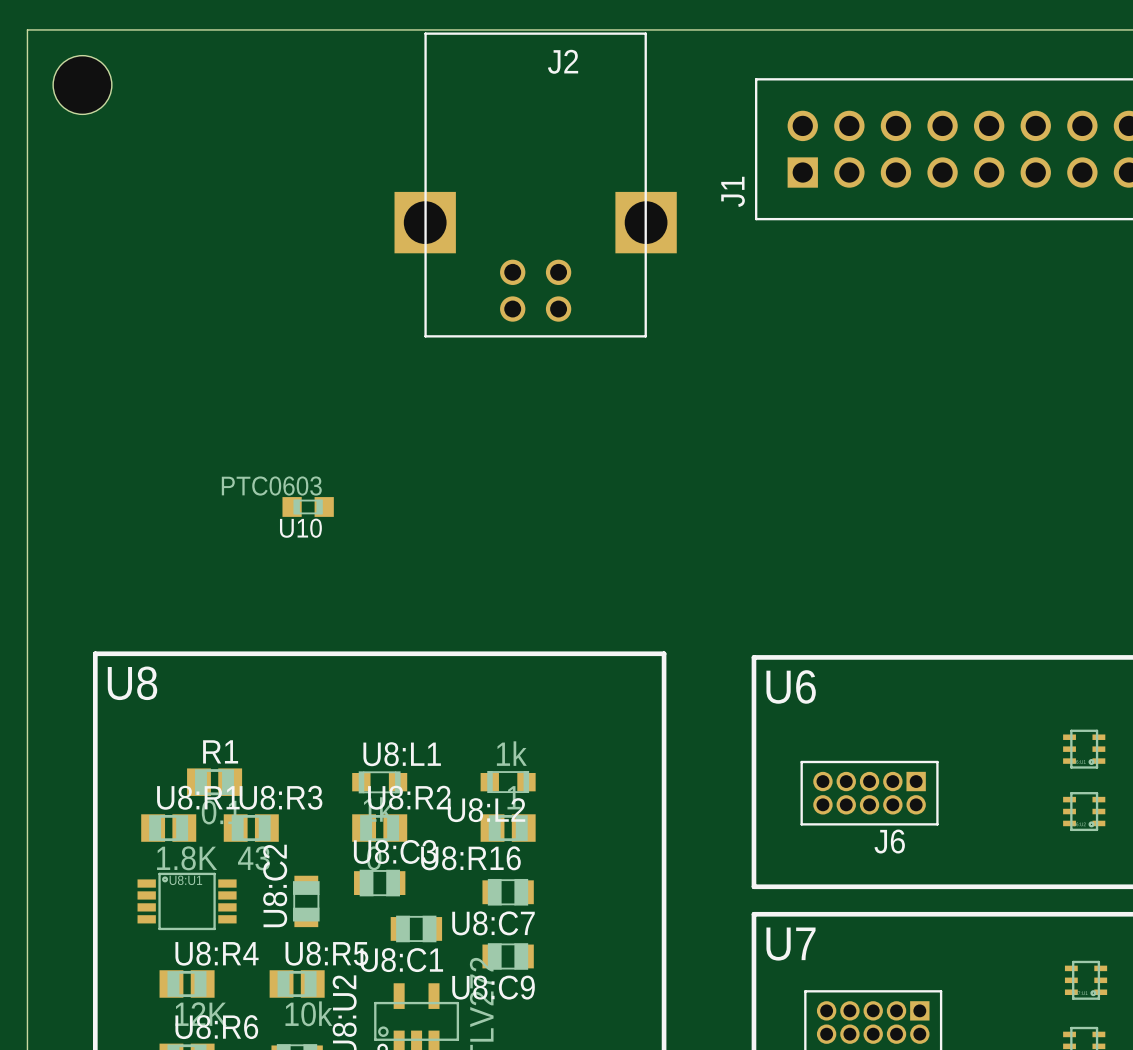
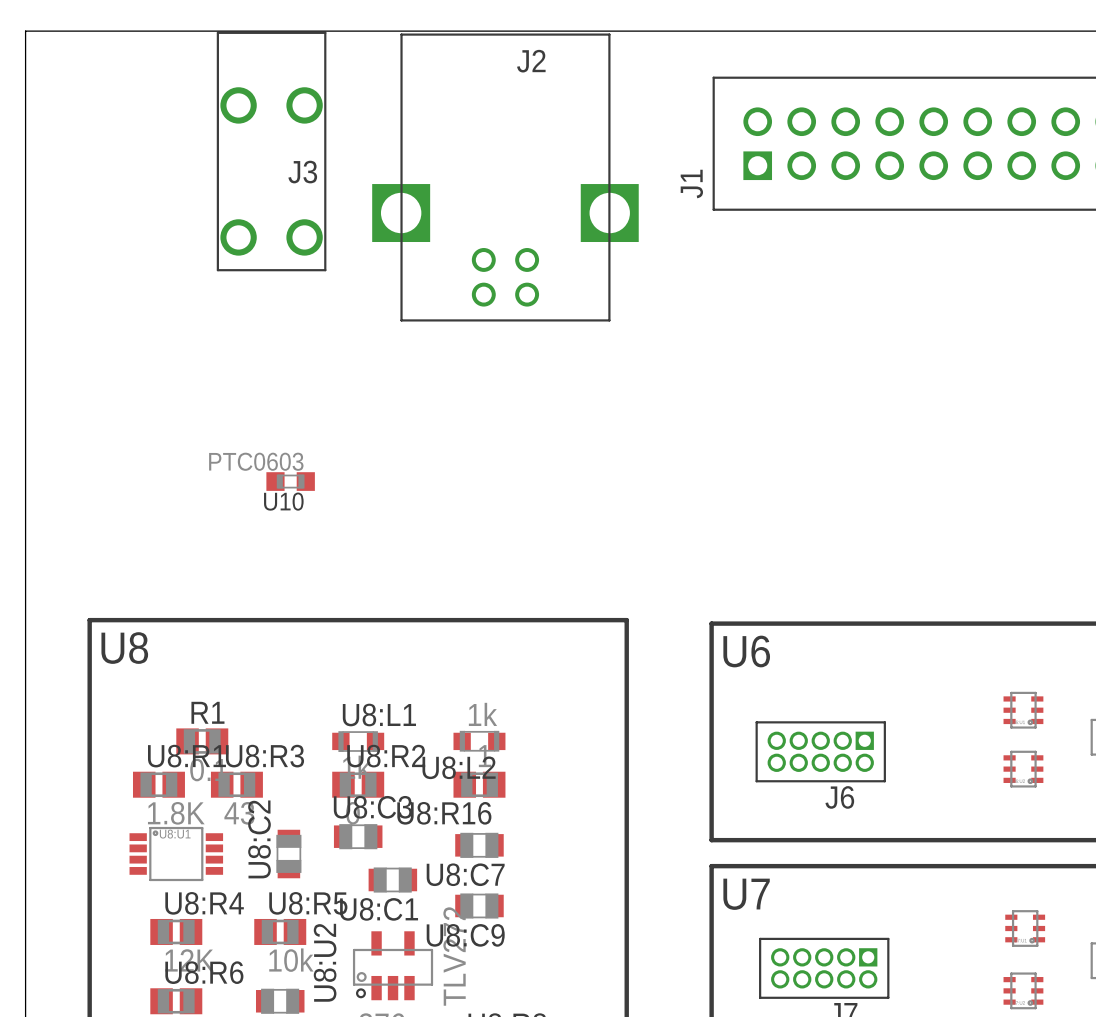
hole: (82, 85) -> none
J3: none -> (271, 151)

